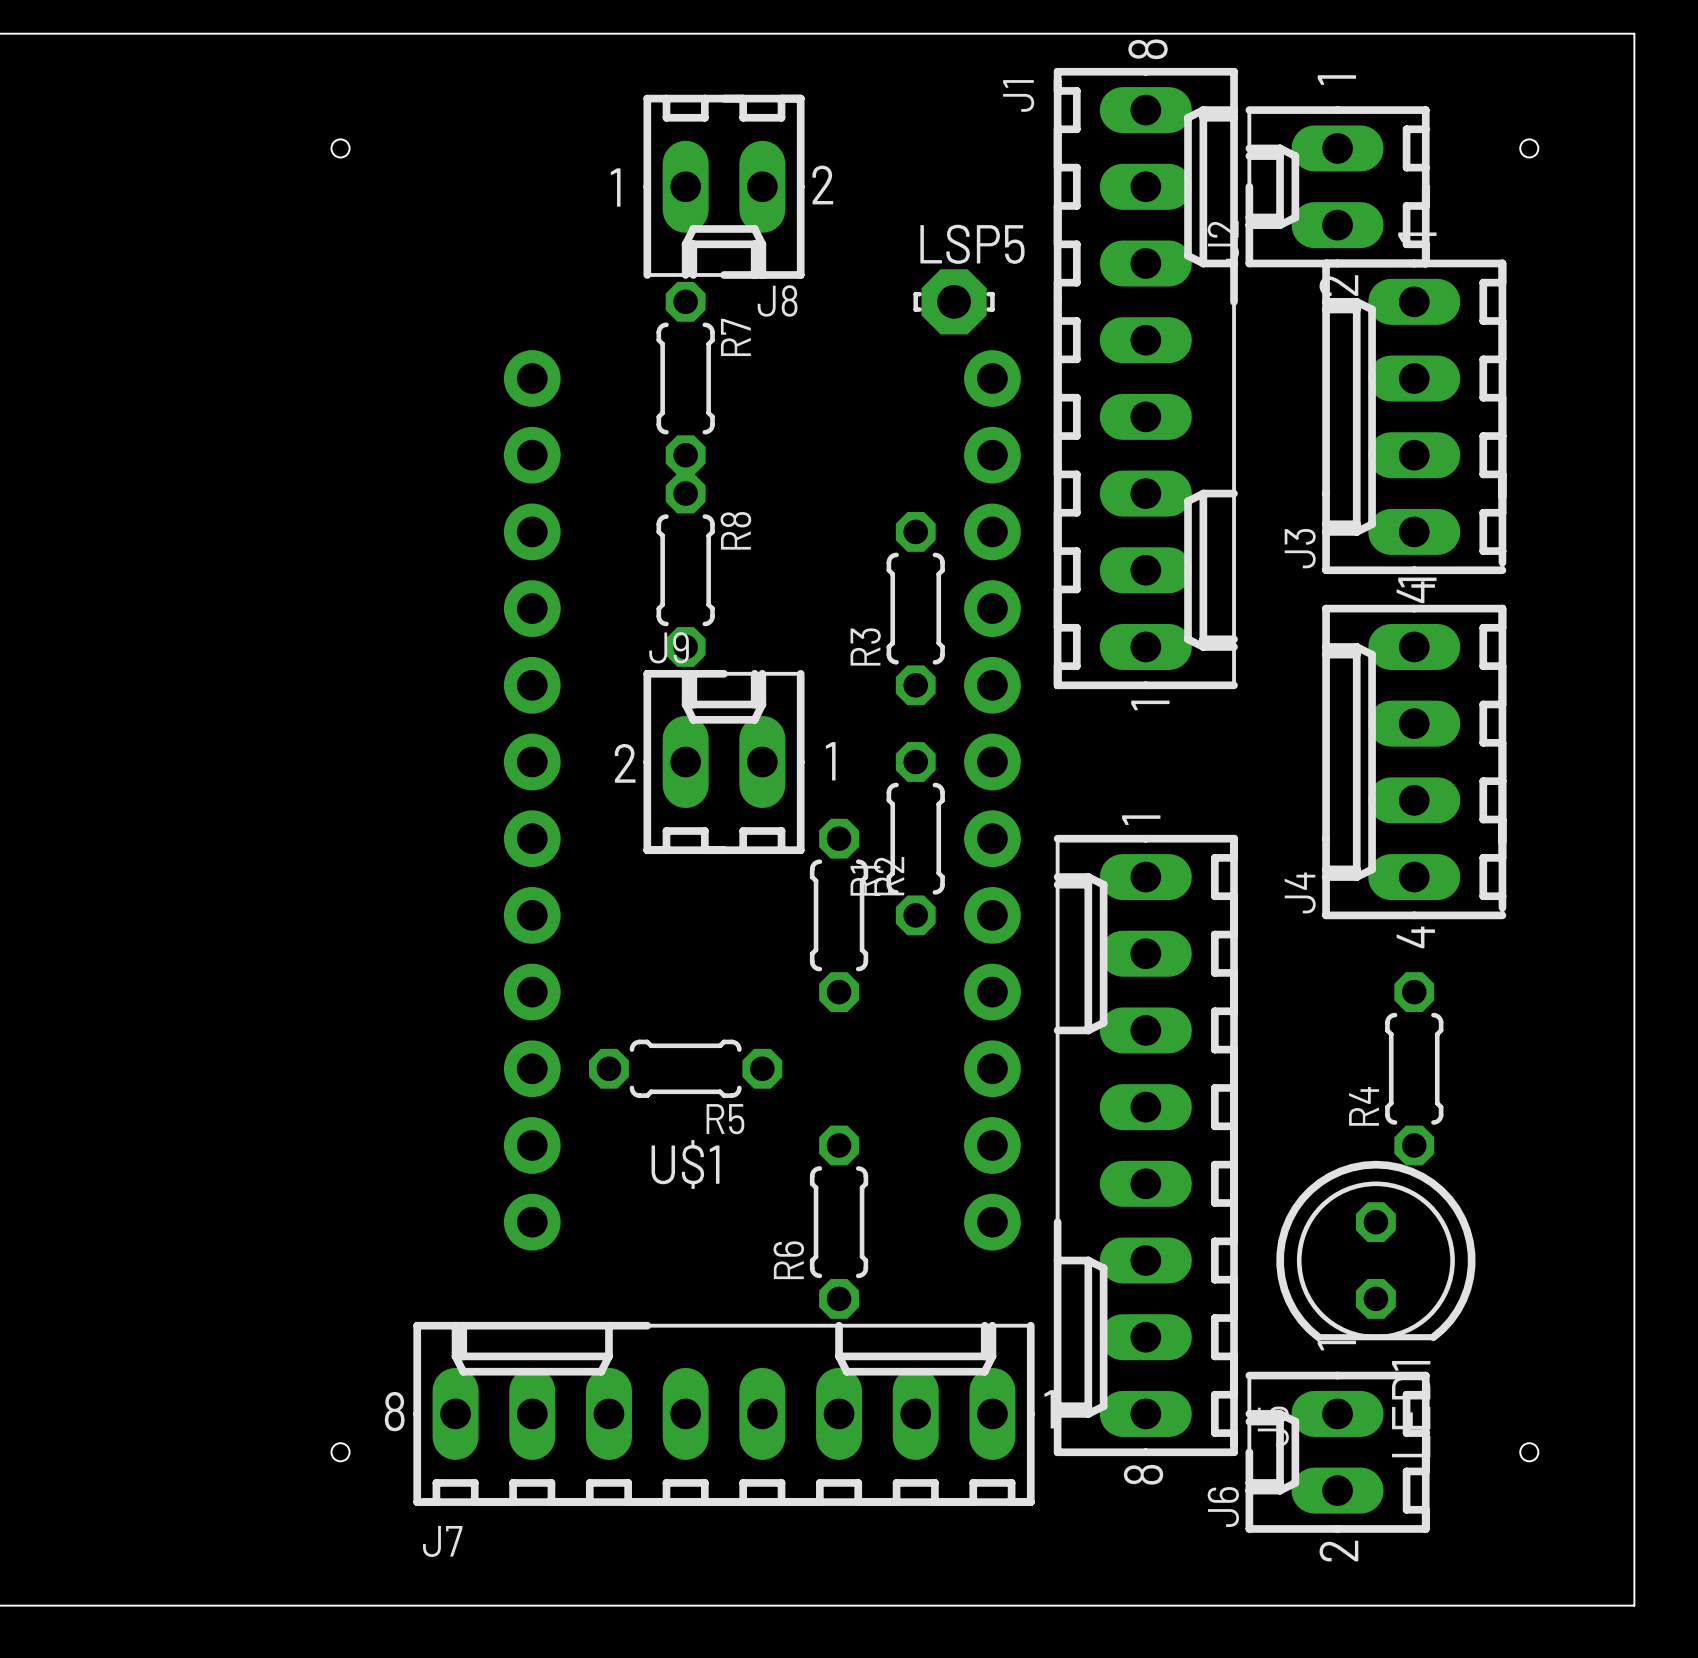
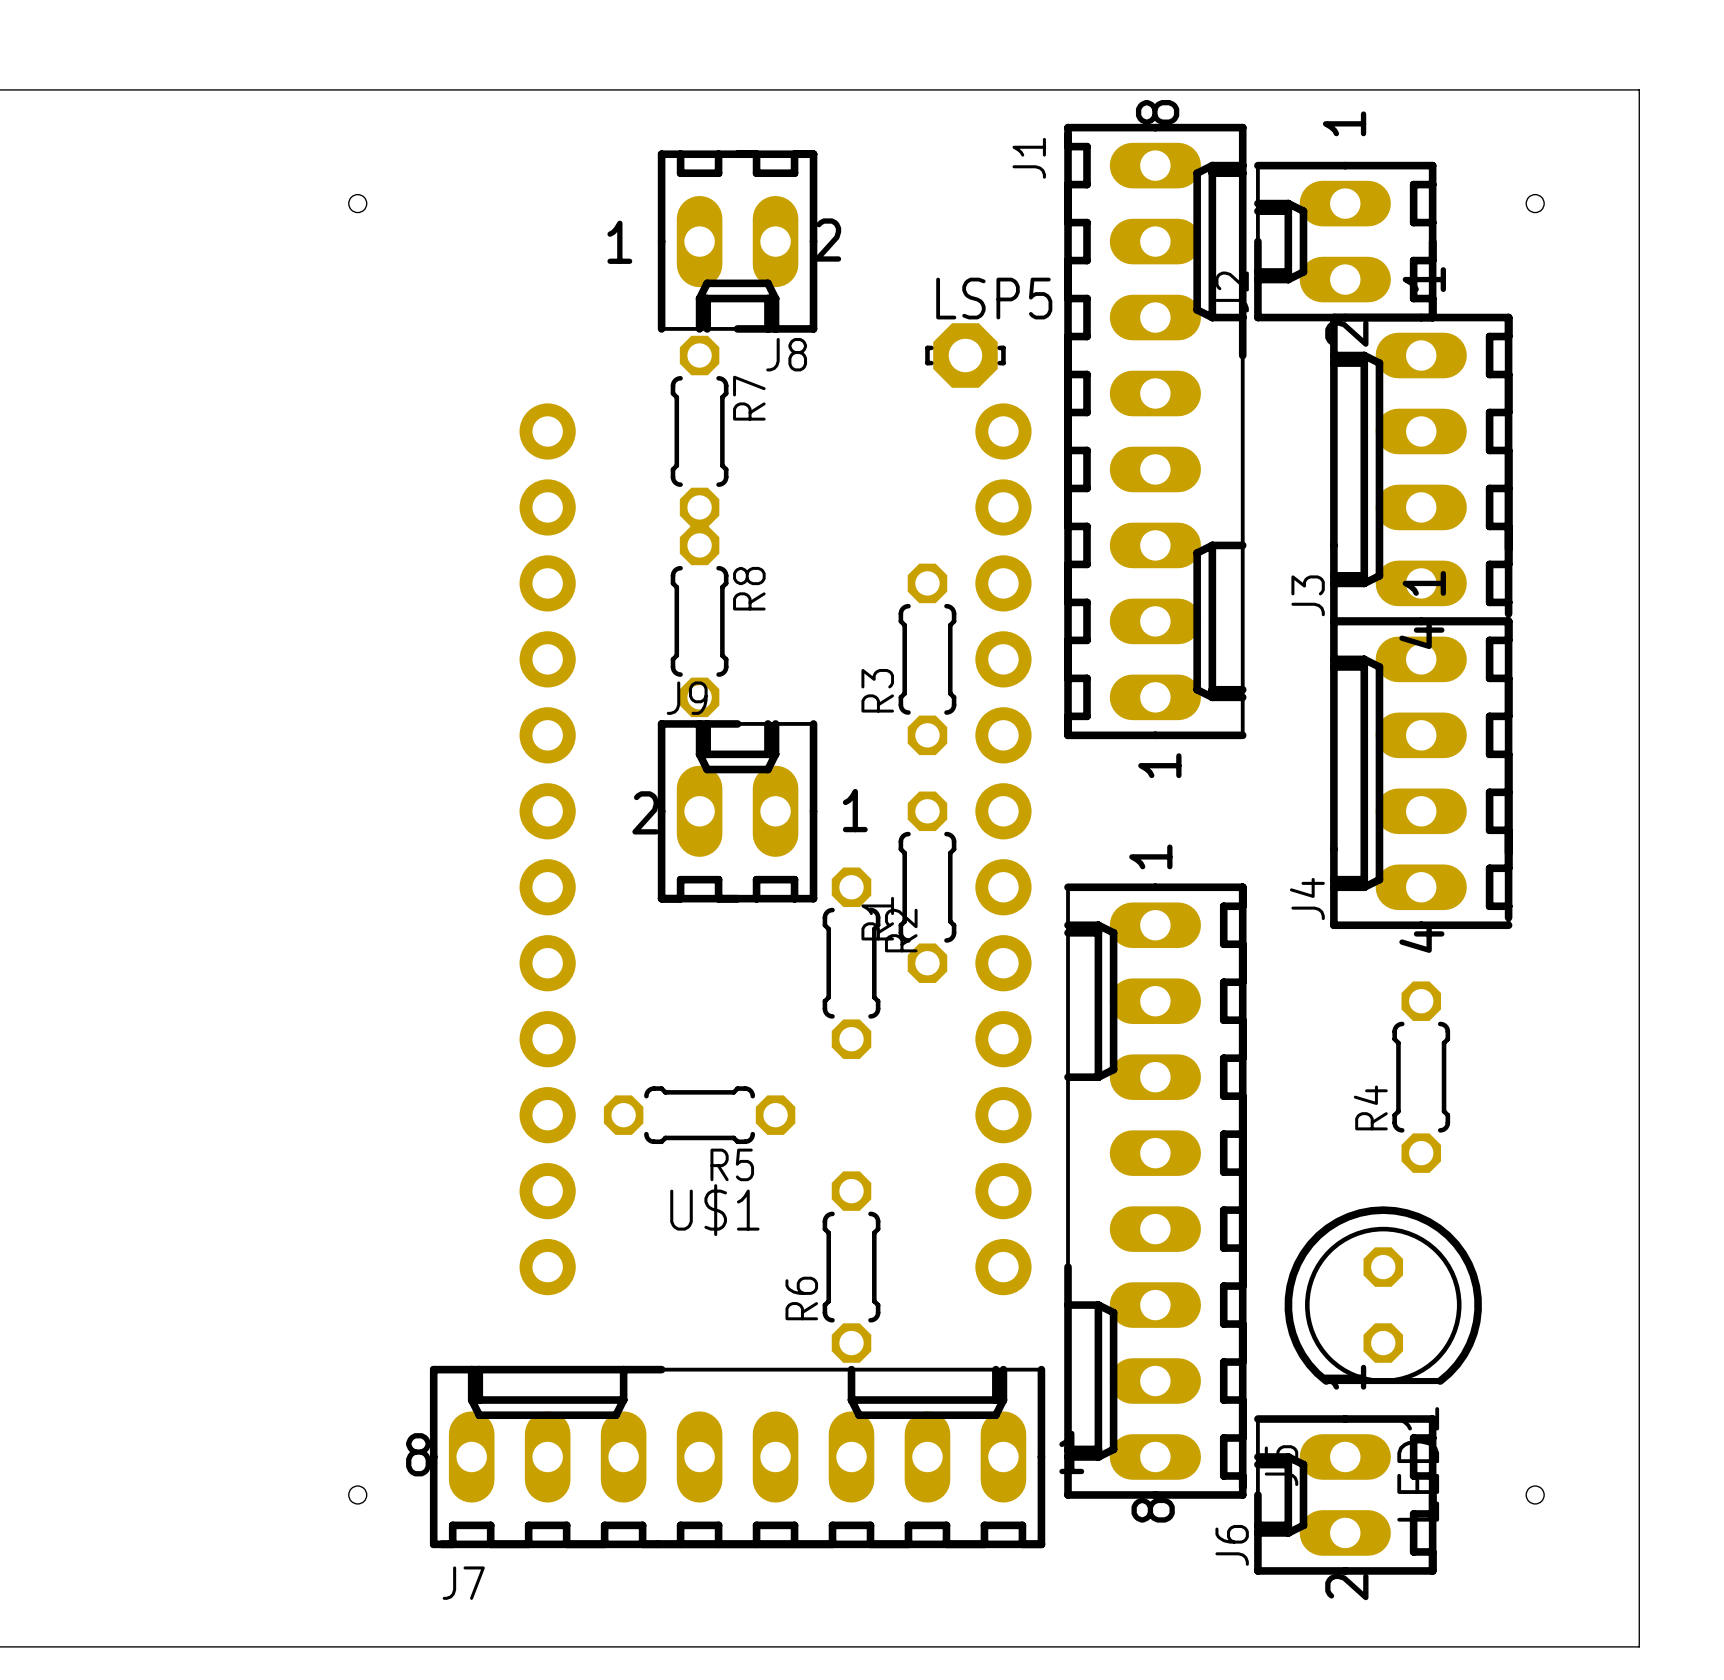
J4 position: (1414, 762) -> (1421, 773)
R4 position: (1414, 1068) -> (1421, 1077)

